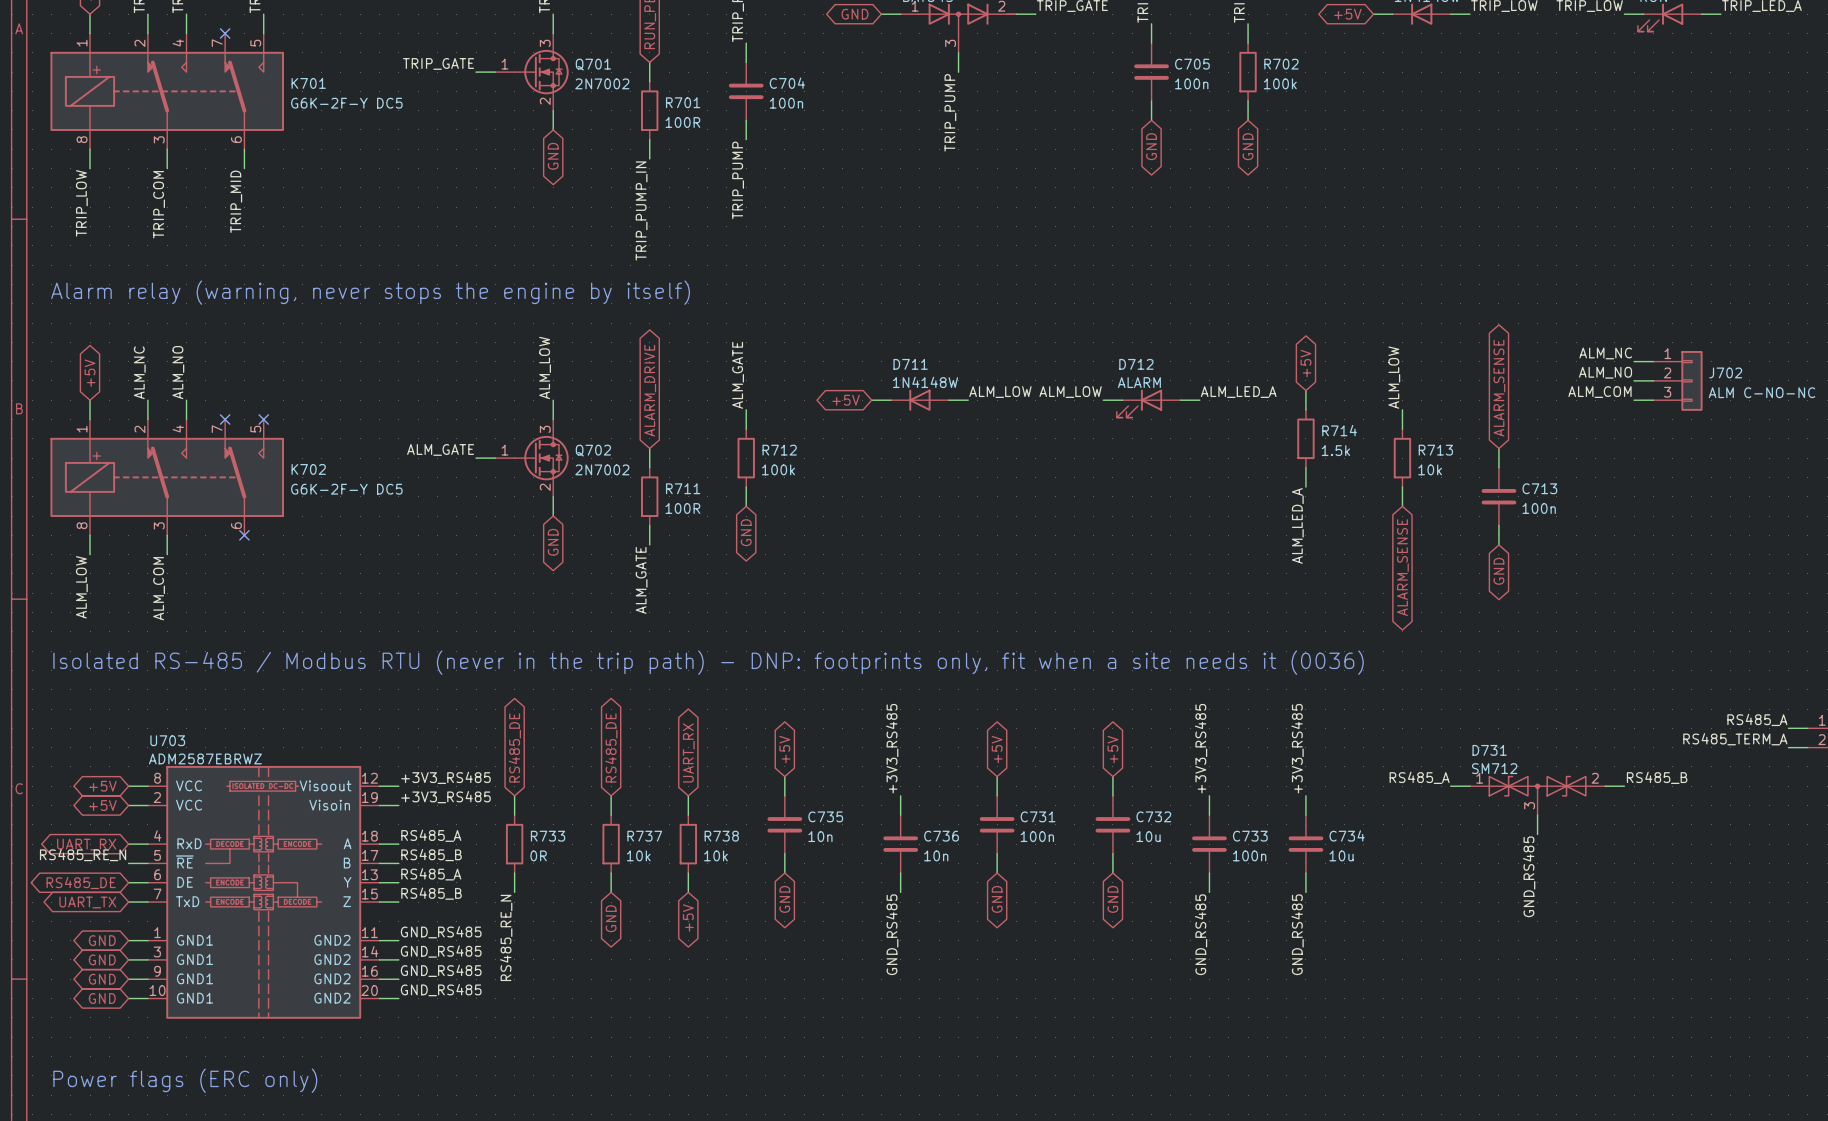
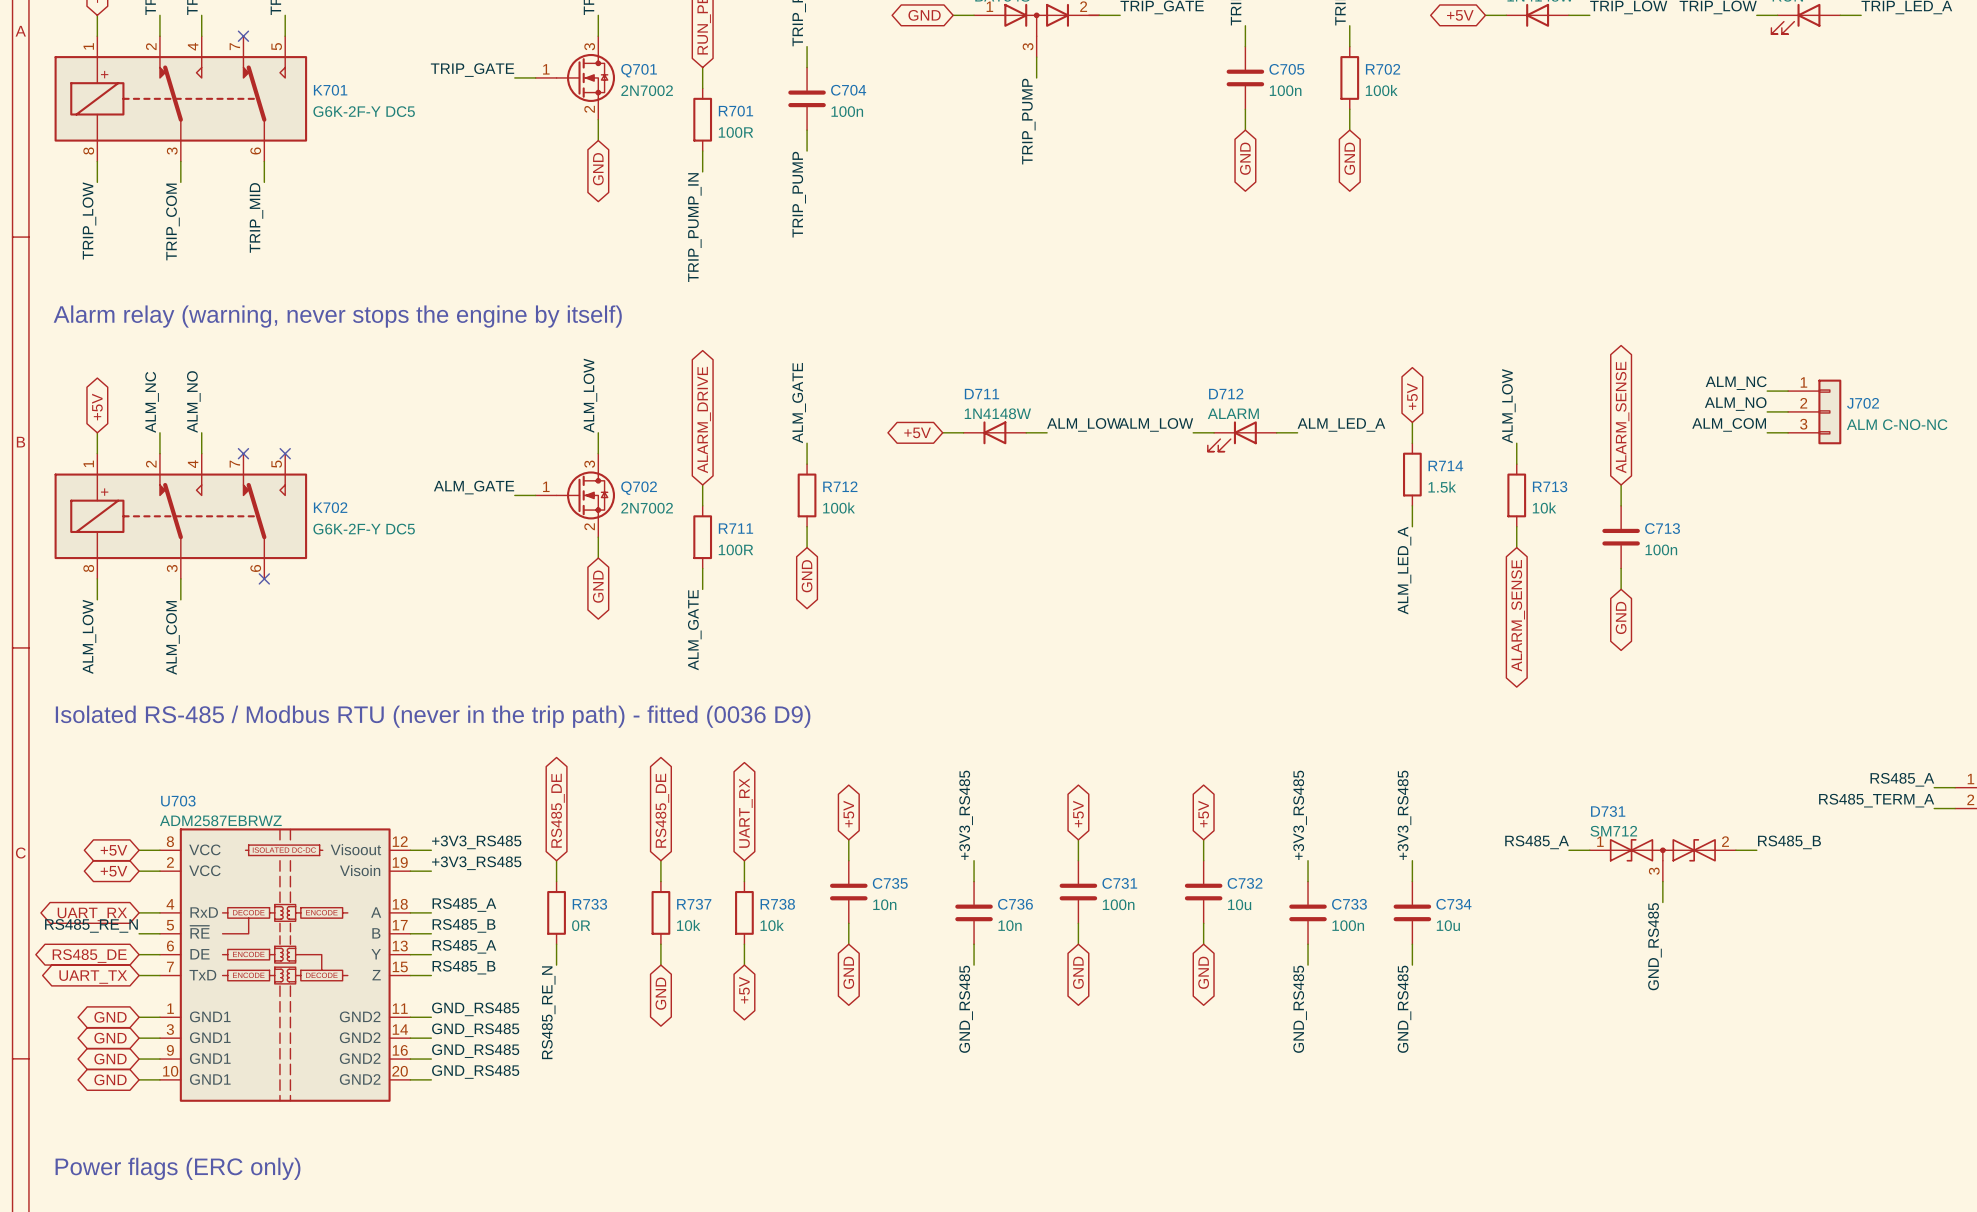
text: Isolated RS-485 / Modbus RTU (never in the trip path) - DNP: footprints only, fit when a site needs it (0036) (708, 662) -> Isolated RS-485 / Modbus RTU (never in the trip path) - fitted (0036 D9) (433, 716)

